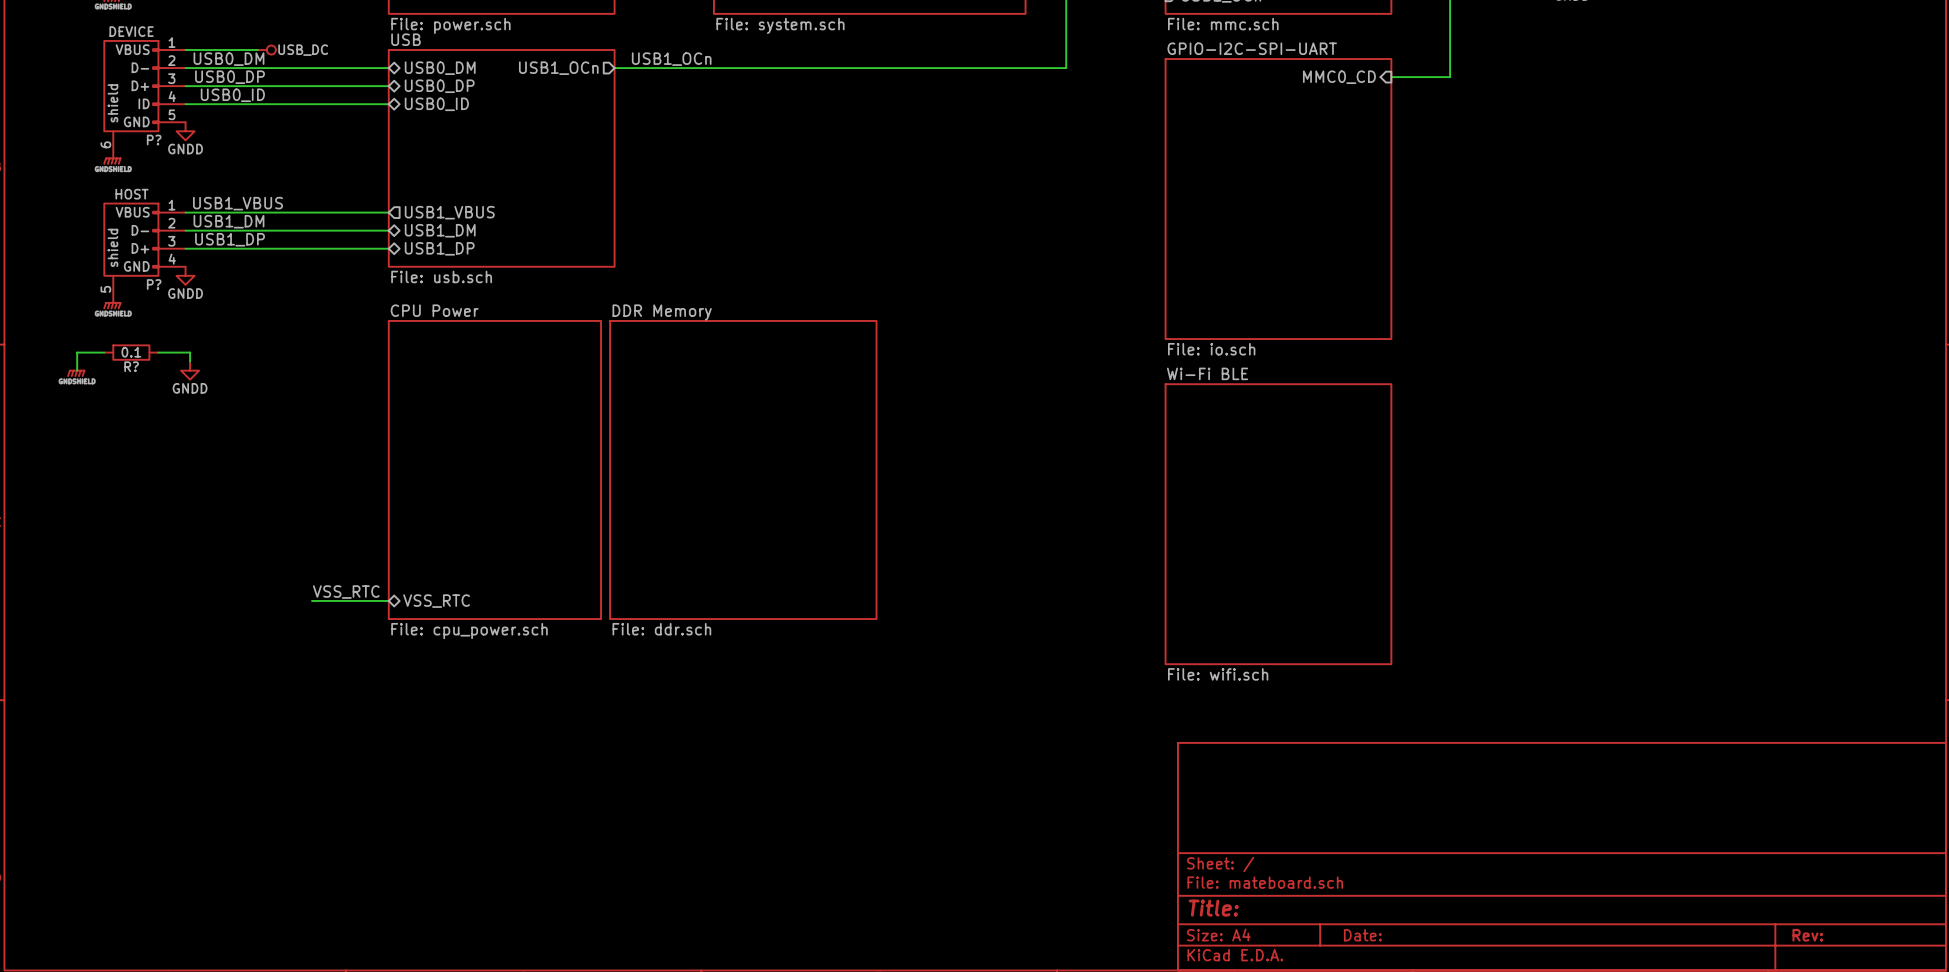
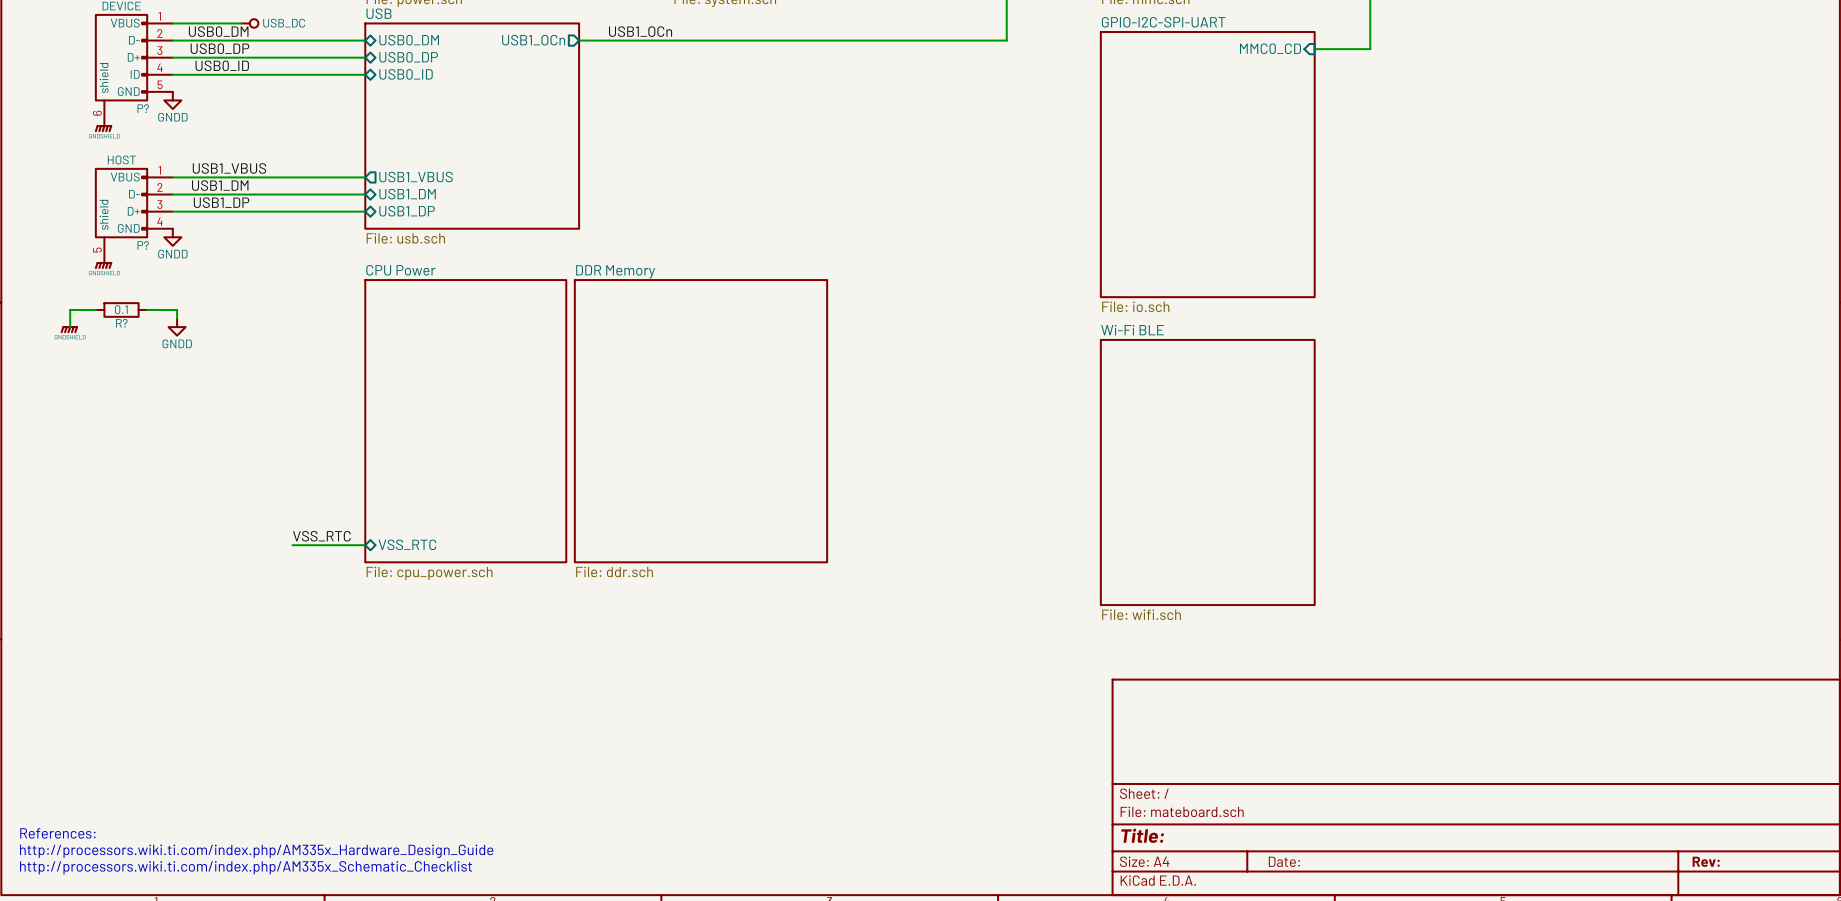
text: none -> References: (57, 833)
text: none -> http://processors.wiki.ti.com/index.php/AM335x_Hardware_Design_Guide (256, 851)
text: none -> http://processors.wiki.ti.com/index.php/AM335x_Schematic_Checklist (246, 867)

